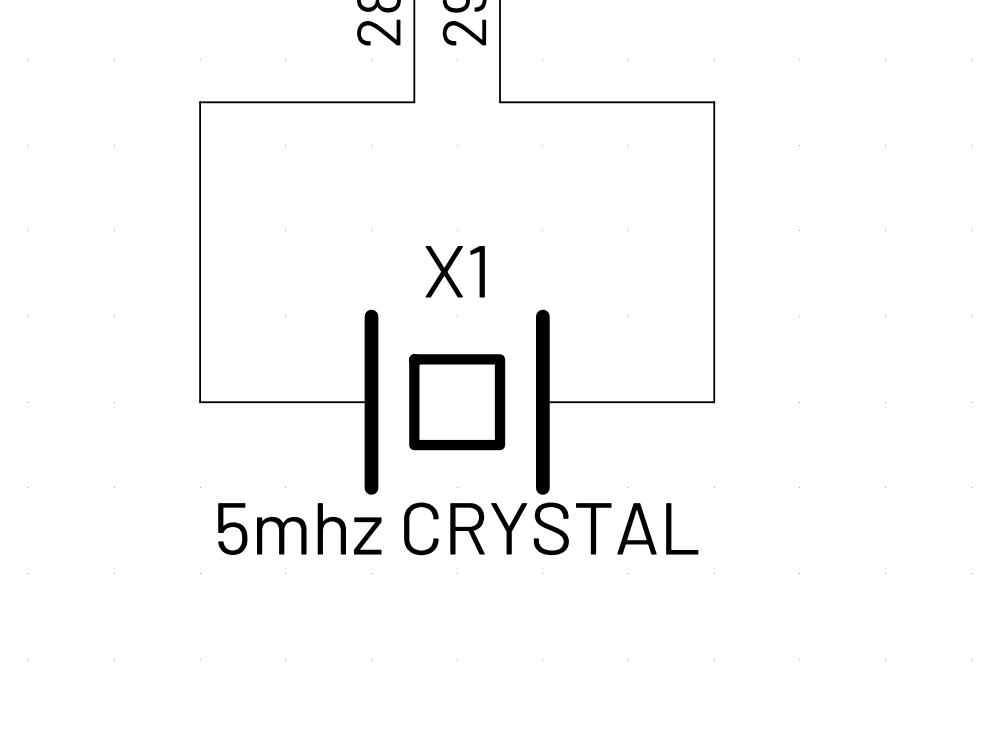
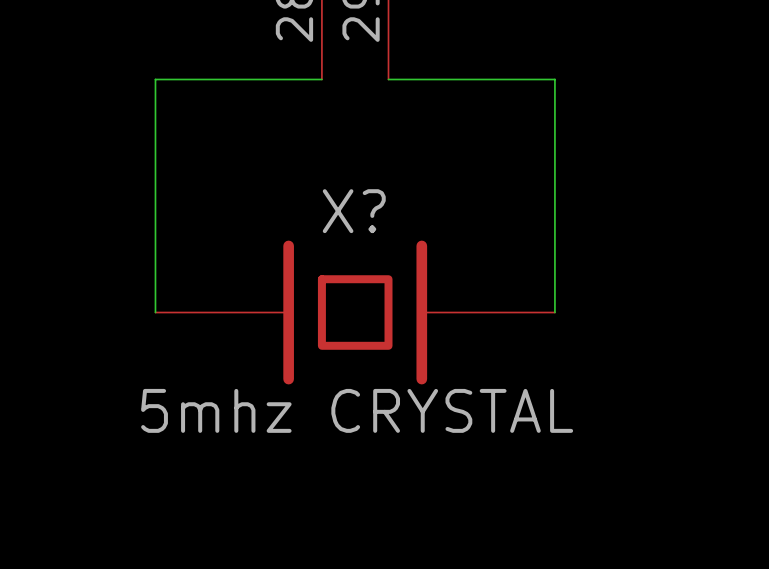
X1 name: X1 (455, 271) -> X? (354, 211)

